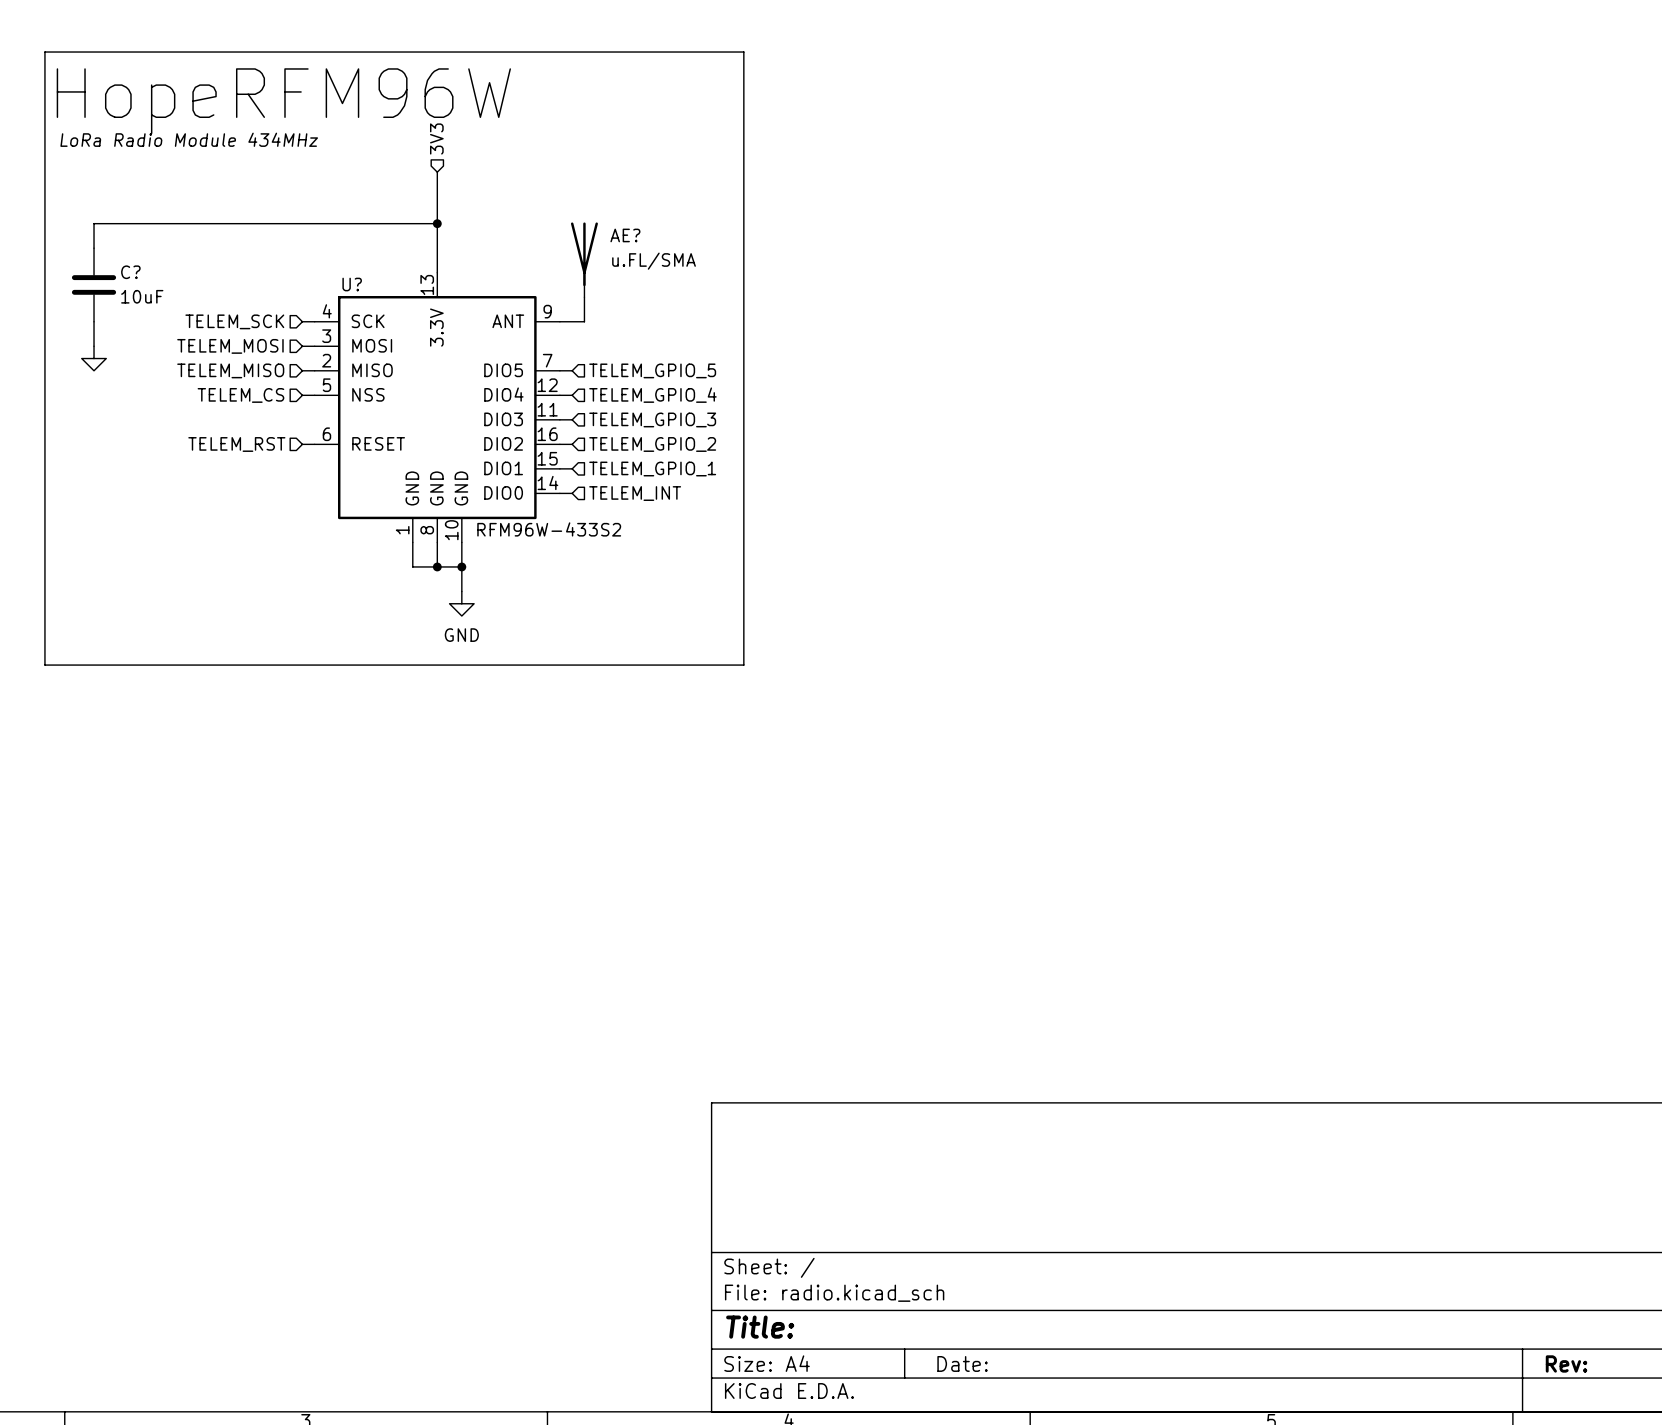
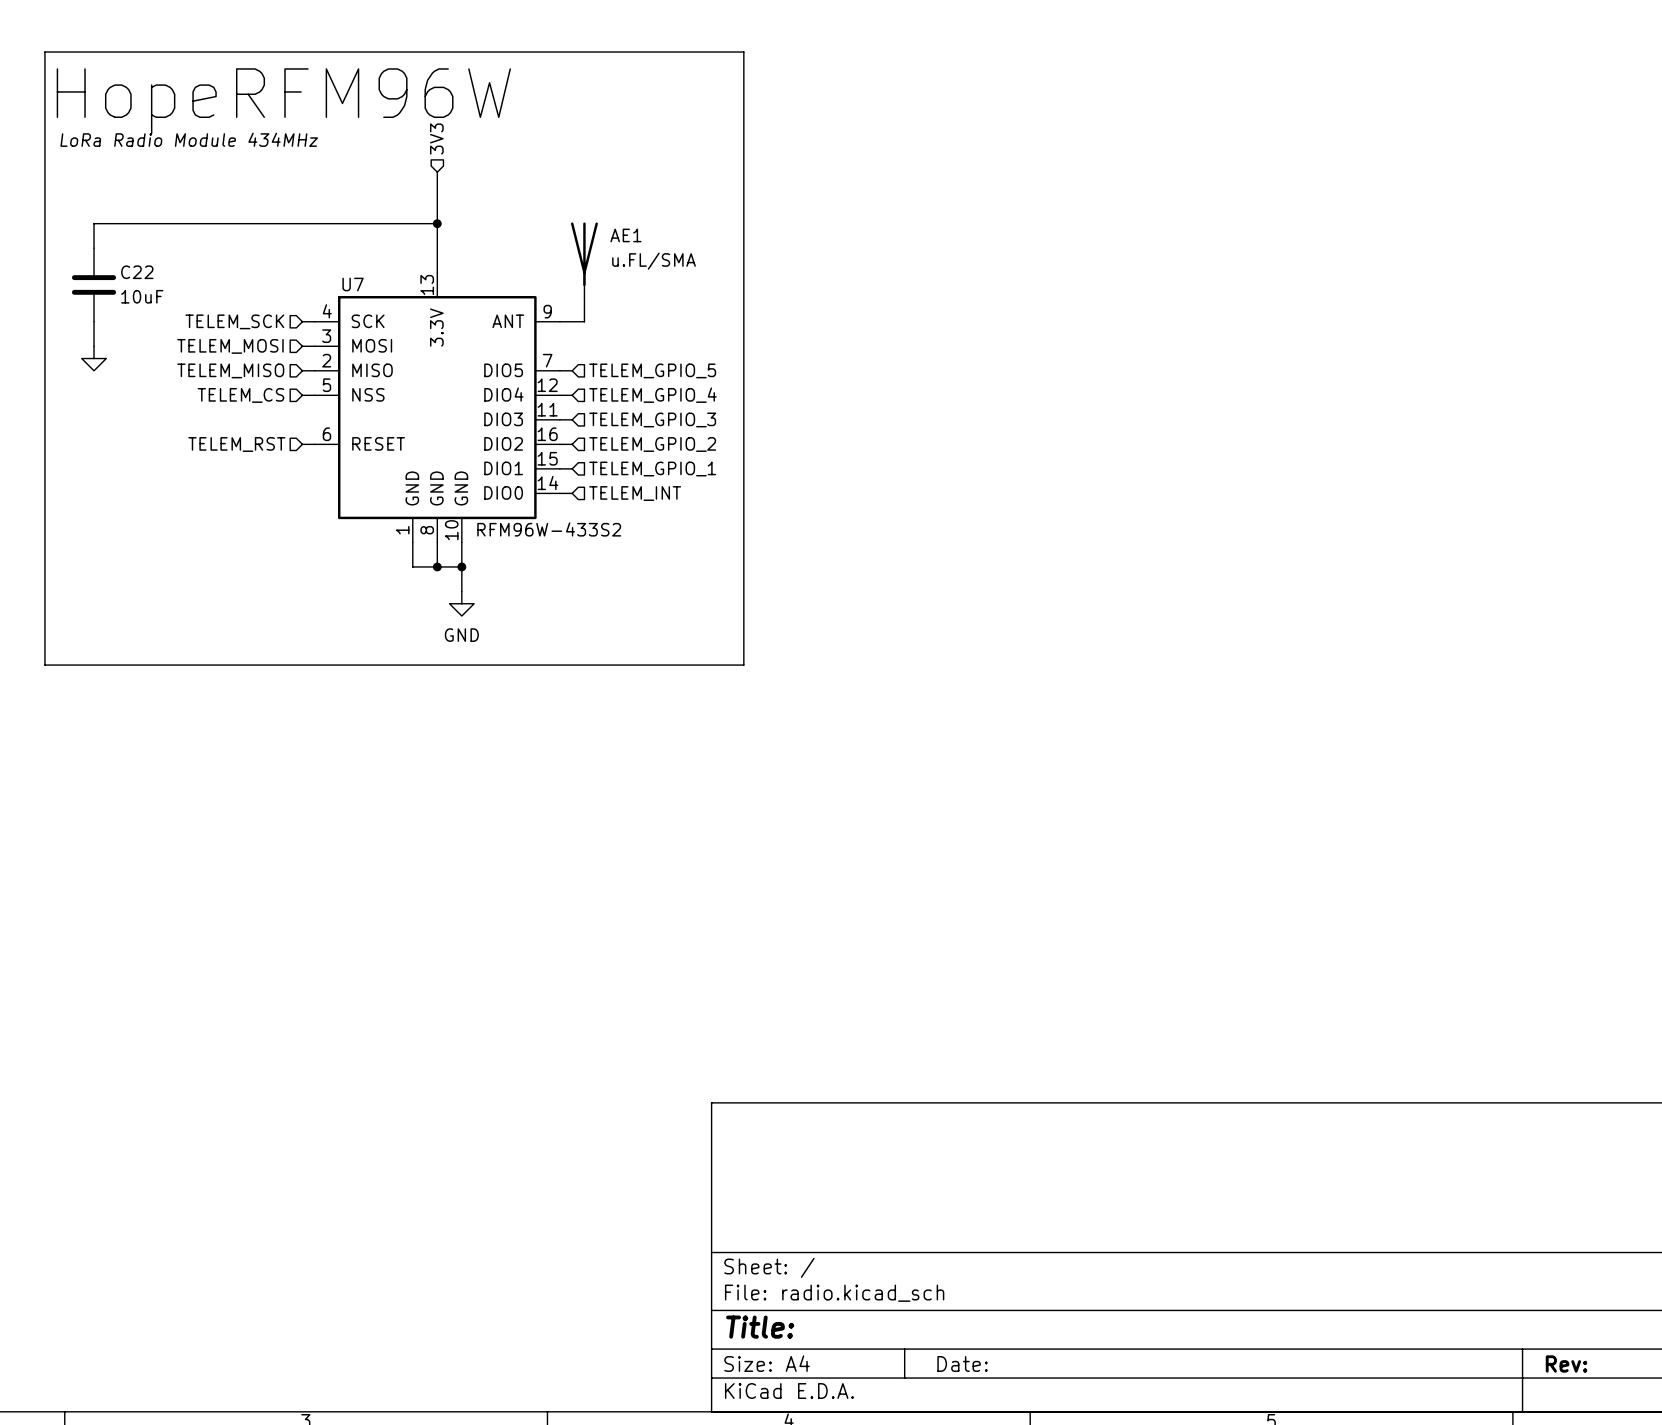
AE? name: AE? (625, 235) -> AE1 (625, 235)
C? name: C? (130, 272) -> C22 (137, 272)
U? name: U? (352, 284) -> U7 (353, 284)

